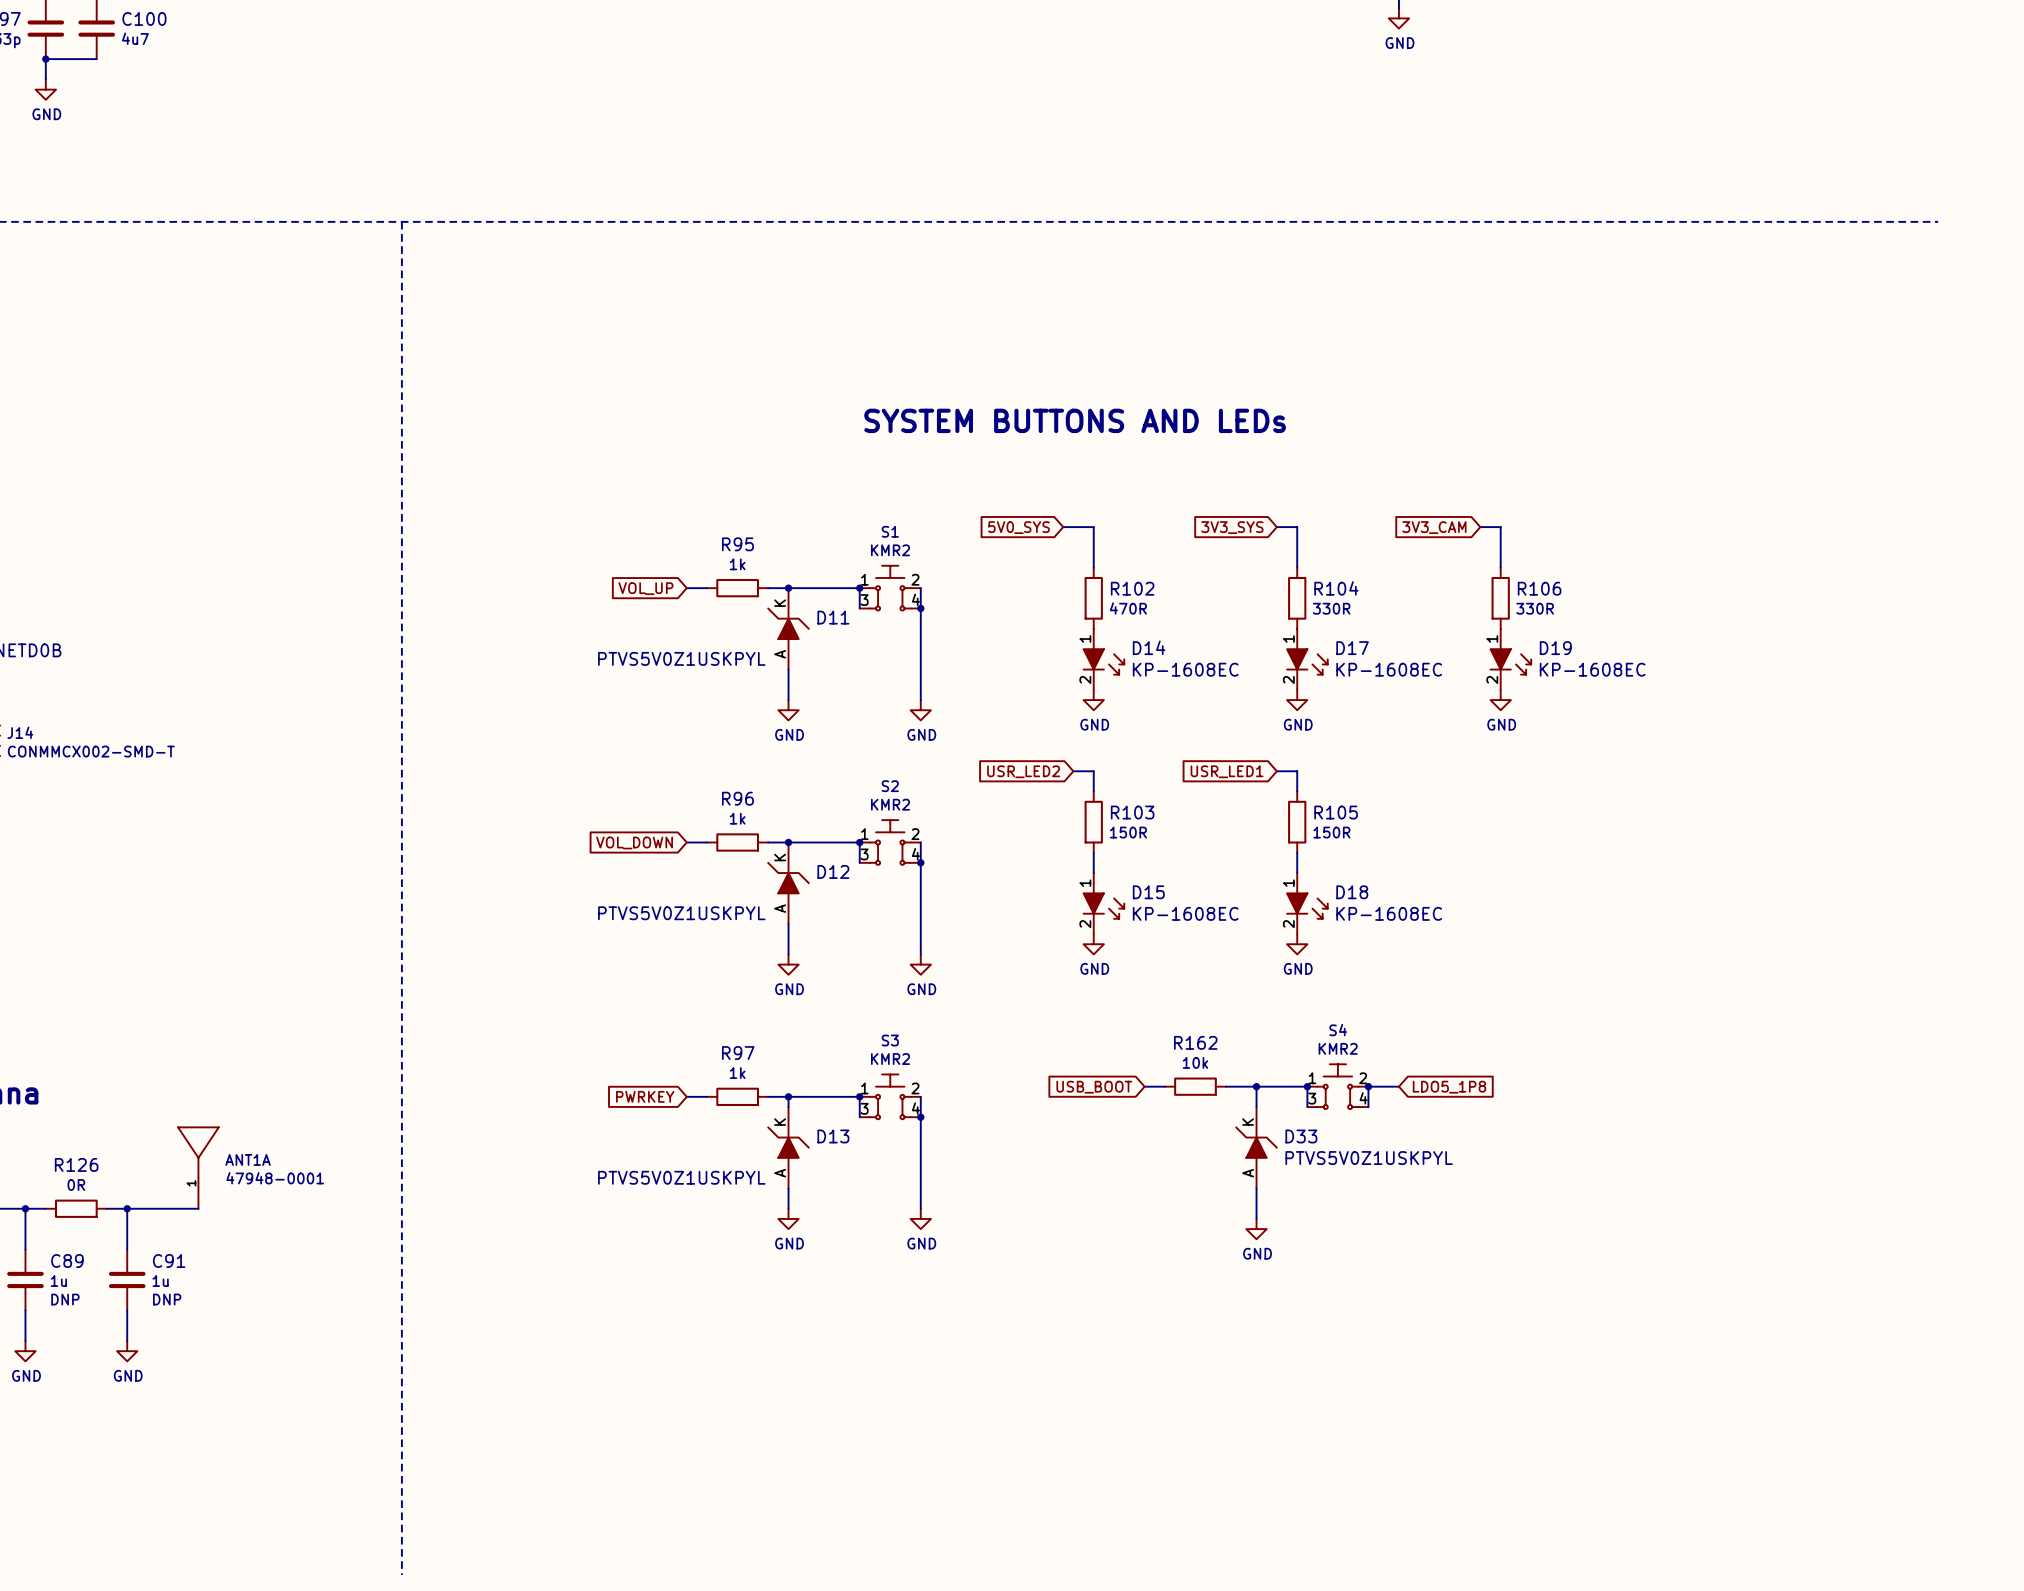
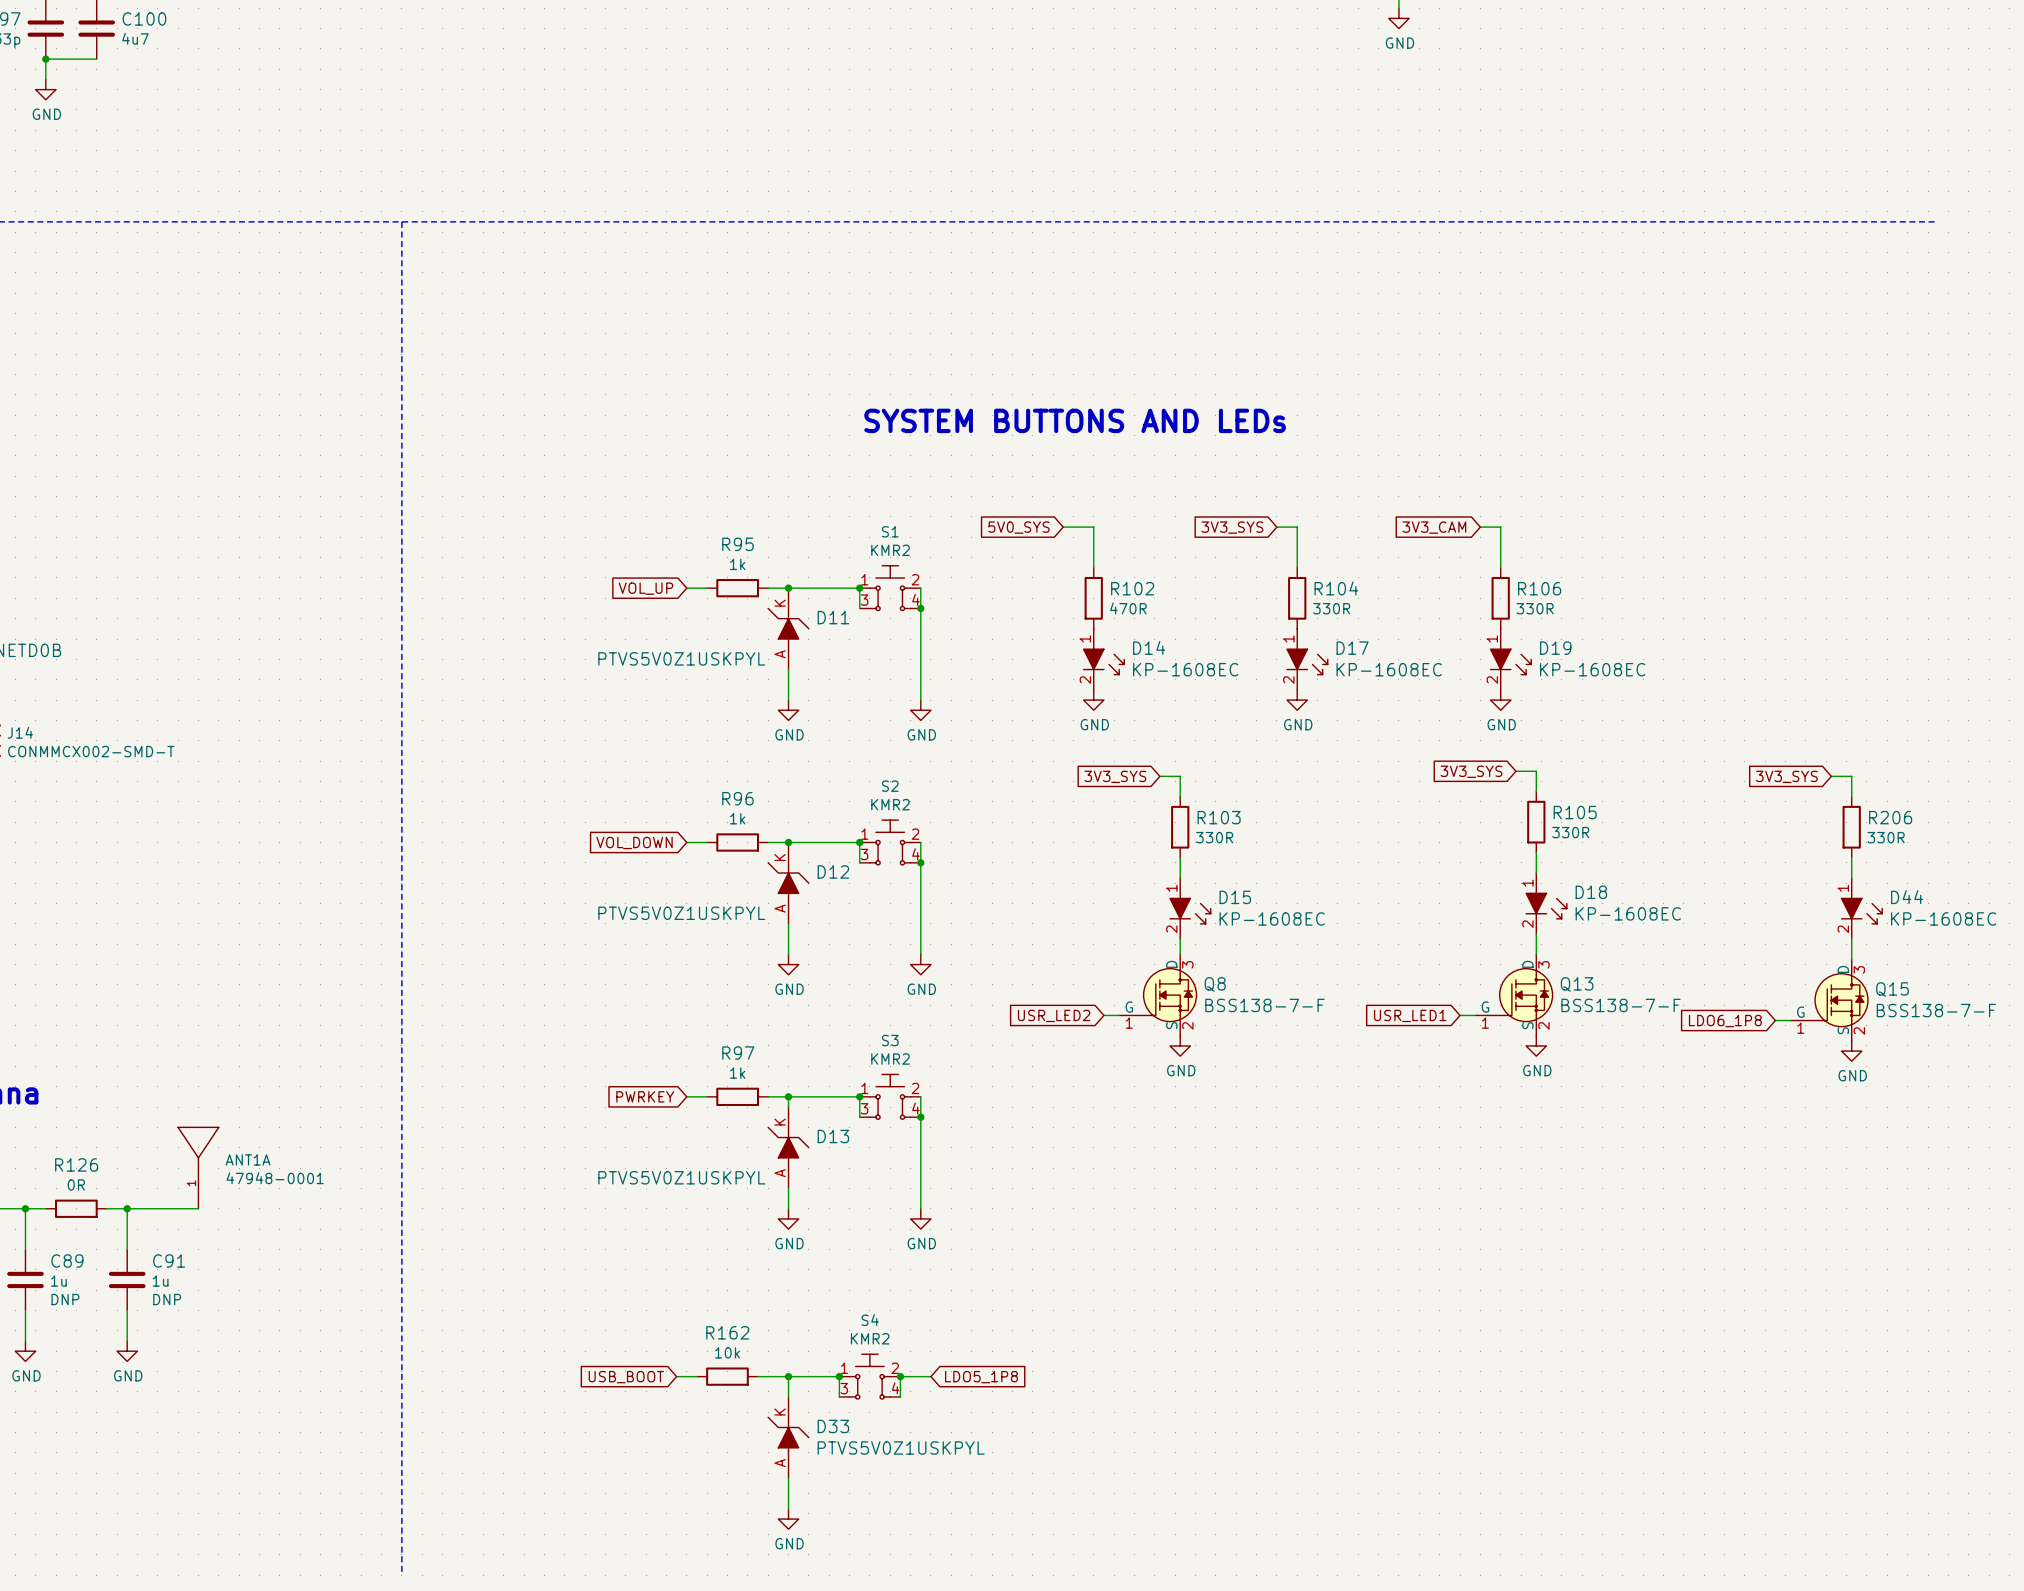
global label: USR_LED2 (1023, 771) -> none
wire: (1073, 771) (1093, 771) (1093, 791) -> (1159, 776) (1180, 776) (1180, 796)
global label: USR_LED1 (1227, 771) -> none
wire: (1276, 771) (1297, 771) (1297, 791) -> none
global label: none -> 3V3_SYS (1471, 771)
wire: none -> (1515, 771) (1536, 771) (1536, 791)
global label: none -> 3V3_SYS (1115, 776)
global label: none -> 3V3_SYS (1786, 776)
wire: none -> (1831, 776) (1851, 776) (1851, 796)
R103 position: (1093, 822) -> (1180, 827)
R105 position: (1297, 822) -> (1536, 822)
R206: none -> (1851, 827)
R103 text: 150R (1128, 832) -> 330R (1214, 837)
R105 text: 150R (1331, 832) -> 330R (1570, 832)
wire: (1093, 852) (1093, 873) -> (1180, 857) (1180, 878)
wire: (1297, 852) (1297, 873) -> none
wire: none -> (1536, 852) (1536, 873)
wire: none -> (1851, 857) (1851, 878)
D15 position: (1103, 903) -> (1190, 908)
D18 position: (1307, 903) -> (1546, 903)
D44: none -> KP-1608EC (1861, 908)
wire: none -> (1536, 934) (1536, 954)
wire: none -> (1180, 939) (1180, 954)
wire: none -> (1851, 939) (1851, 959)
power symbol: GND (1093, 944) -> none
power symbol: GND (1297, 944) -> none
Q8: none -> BSS138-7-F (1157, 995)
Q13: none -> BSS138-7-F (1513, 995)
Q15: none -> BSS138-7-F (1829, 1000)
global label: none -> USR_LED2 (1054, 1015)
wire: none -> (1103, 1015) (1119, 1015)
global label: none -> USR_LED1 (1410, 1015)
wire: none -> (1460, 1015) (1475, 1015)
wire: none -> (1775, 1020) (1790, 1020)
global label: none -> LDO6_1P8 (1725, 1021)
power symbol: none -> GND (1180, 1045)
power symbol: none -> GND (1536, 1045)
power symbol: none -> GND (1851, 1051)
wire: (1144, 1086) (1164, 1086) -> none
R162 position: (1195, 1086) -> (727, 1376)
wire: (1226, 1086) (1307, 1086) (1307, 1107) -> none
wire: (1256, 1086) (1256, 1107) -> none
junction: (1256, 1086) -> none
junction: (1307, 1086) -> none
S4 position: (1337, 1086) -> (869, 1376)
junction: (1368, 1086) -> none
wire: (1398, 1086) (1368, 1086) (1368, 1107) -> none
global label: USB_BOOT (1094, 1087) -> none
global label: LDO5_1P8 (1449, 1087) -> none
D33 position: (1256, 1147) -> (788, 1437)
wire: (1256, 1188) (1256, 1218) -> none
power symbol: GND (1256, 1229) -> none
wire: none -> (676, 1376) (696, 1376)
wire: none -> (758, 1376) (839, 1376) (839, 1396)
wire: none -> (788, 1376) (788, 1396)
junction: none -> (788, 1376)
junction: none -> (839, 1376)
junction: none -> (900, 1376)
wire: none -> (930, 1376) (900, 1376) (900, 1396)
global label: none -> USB_BOOT (626, 1377)
global label: none -> LDO5_1P8 (981, 1377)
wire: none -> (788, 1478) (788, 1508)
power symbol: none -> GND (788, 1519)

